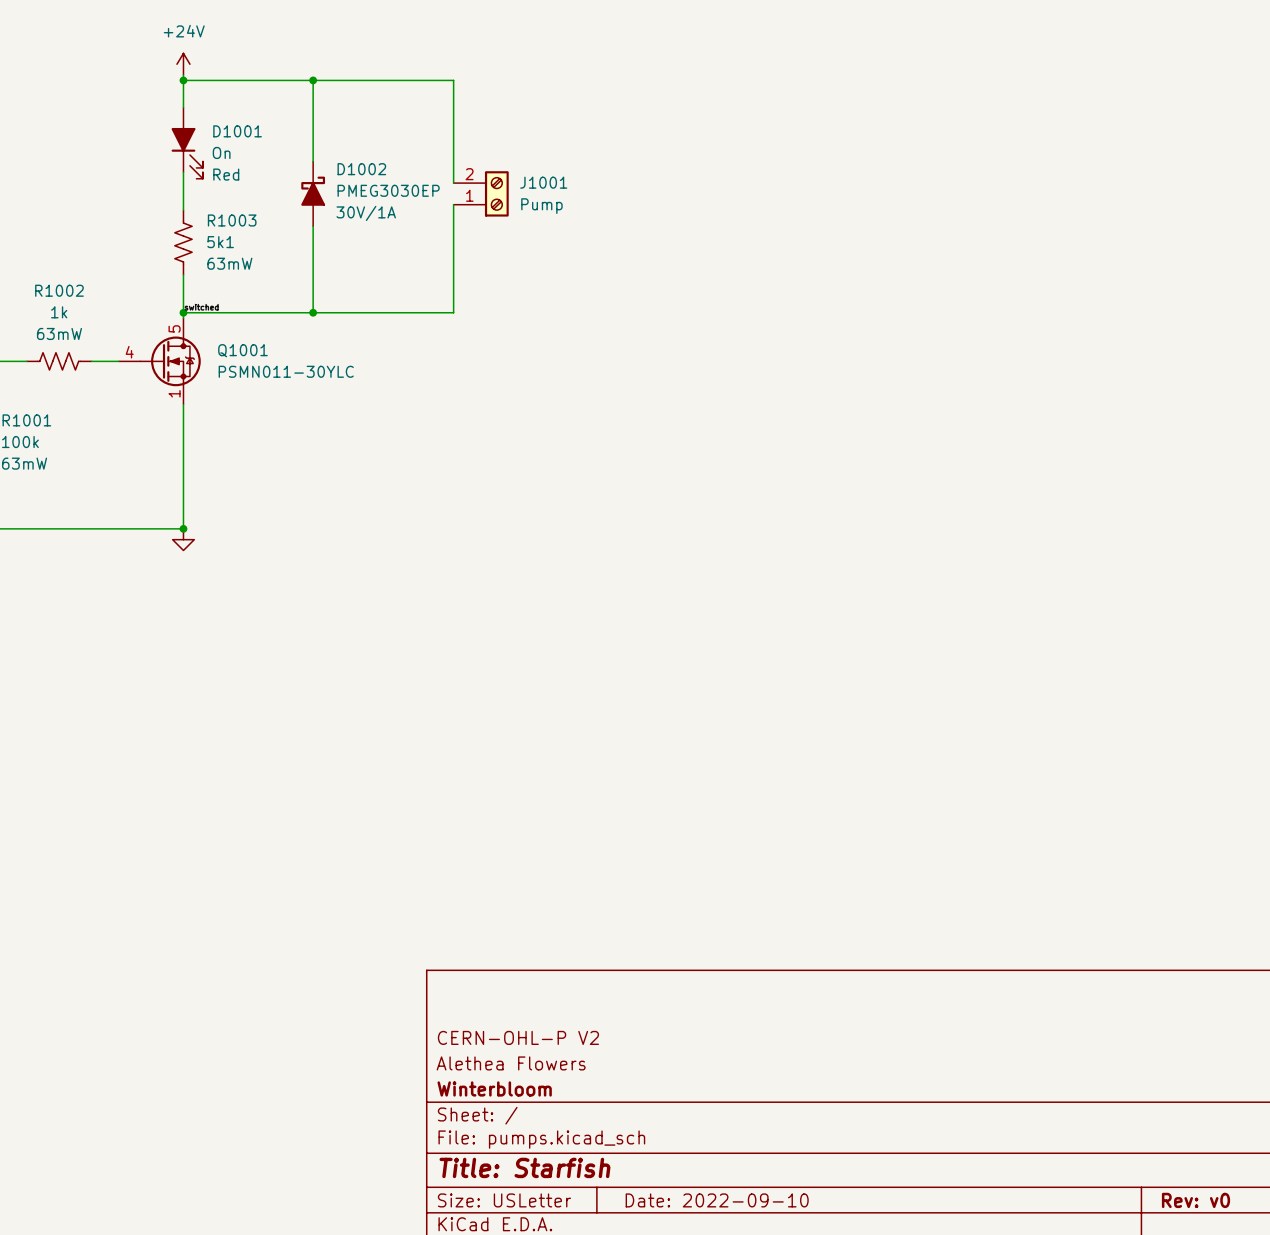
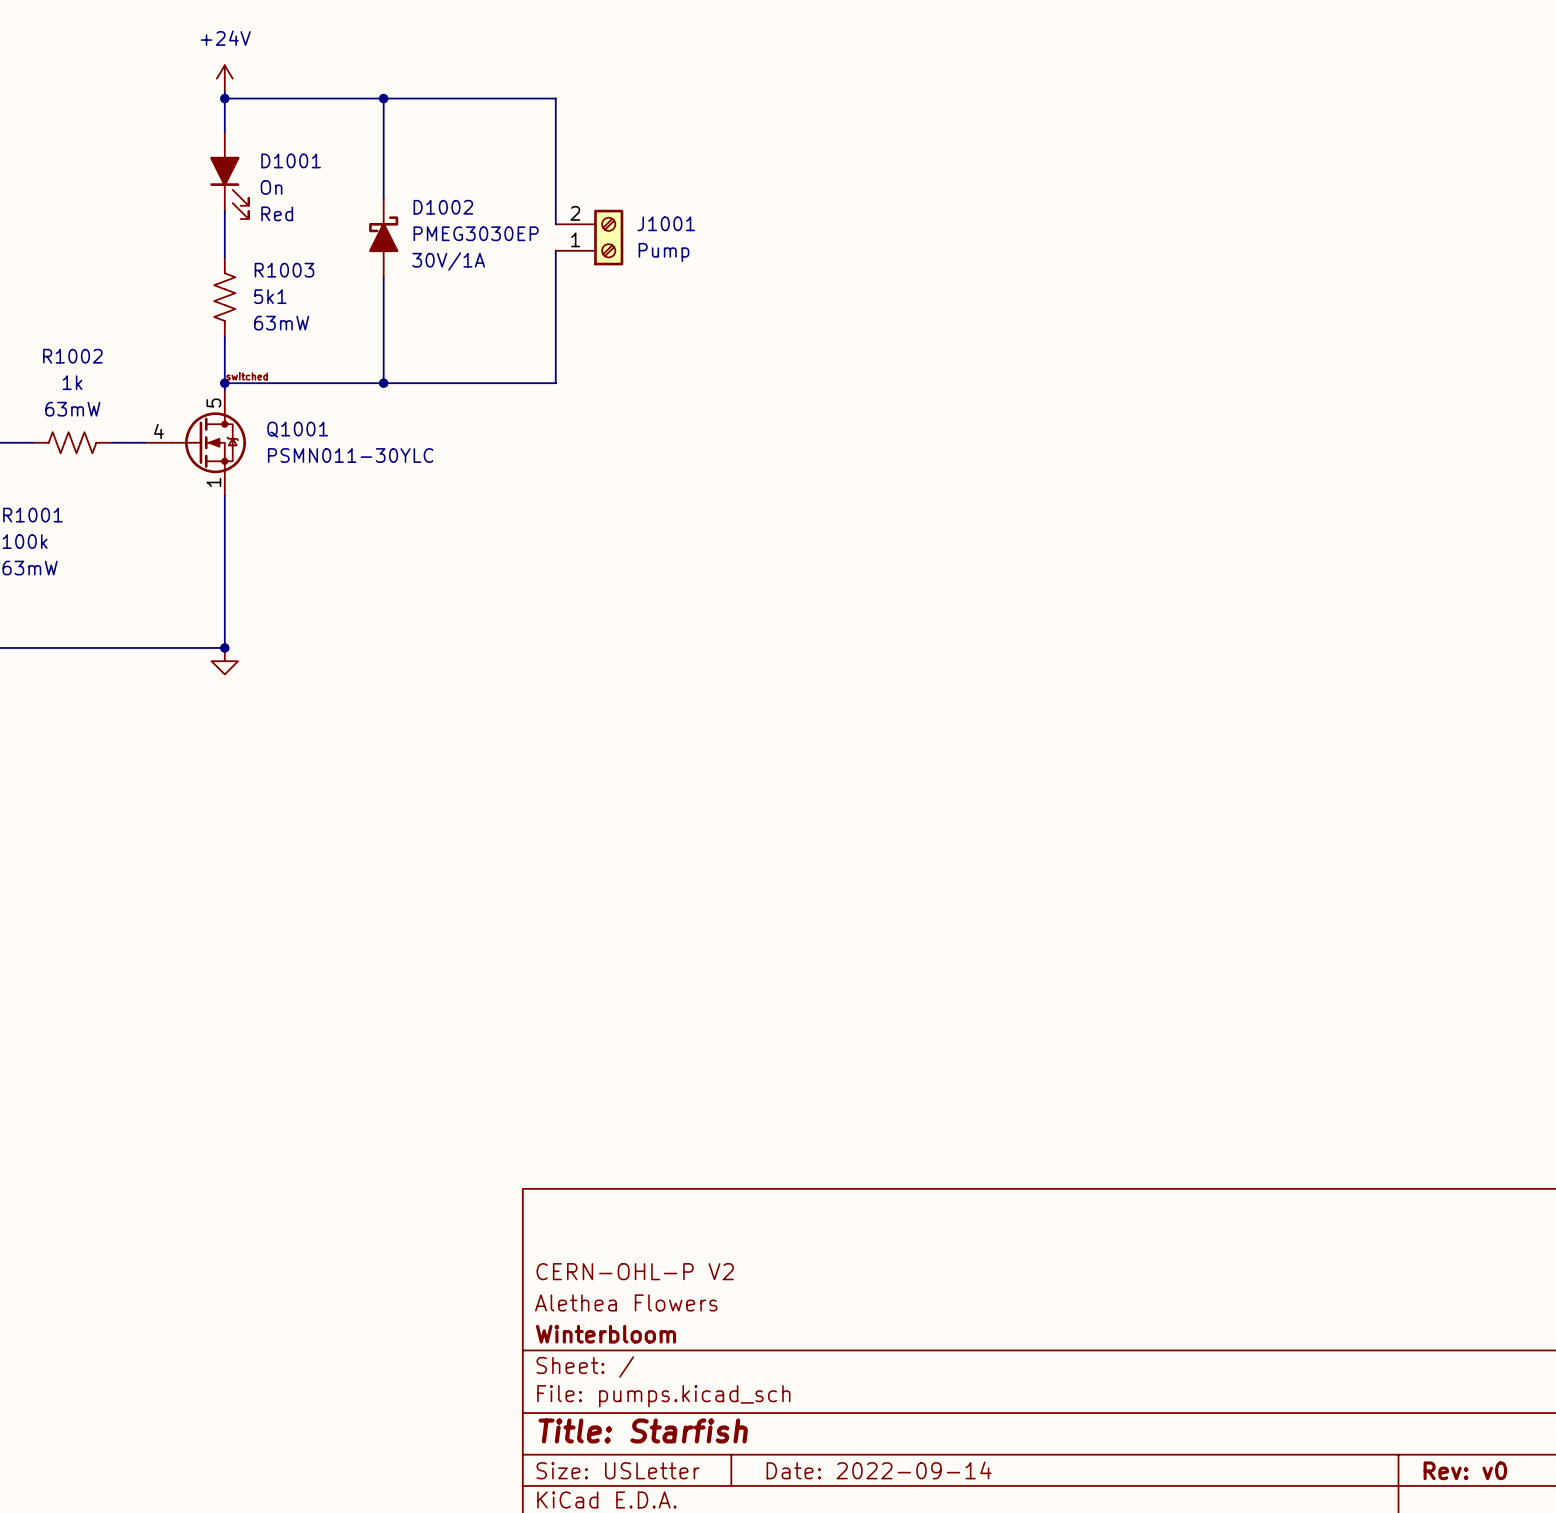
title block: Date: 2022-09-10 (717, 1200) -> Date: 2022-09-14 (879, 1470)

